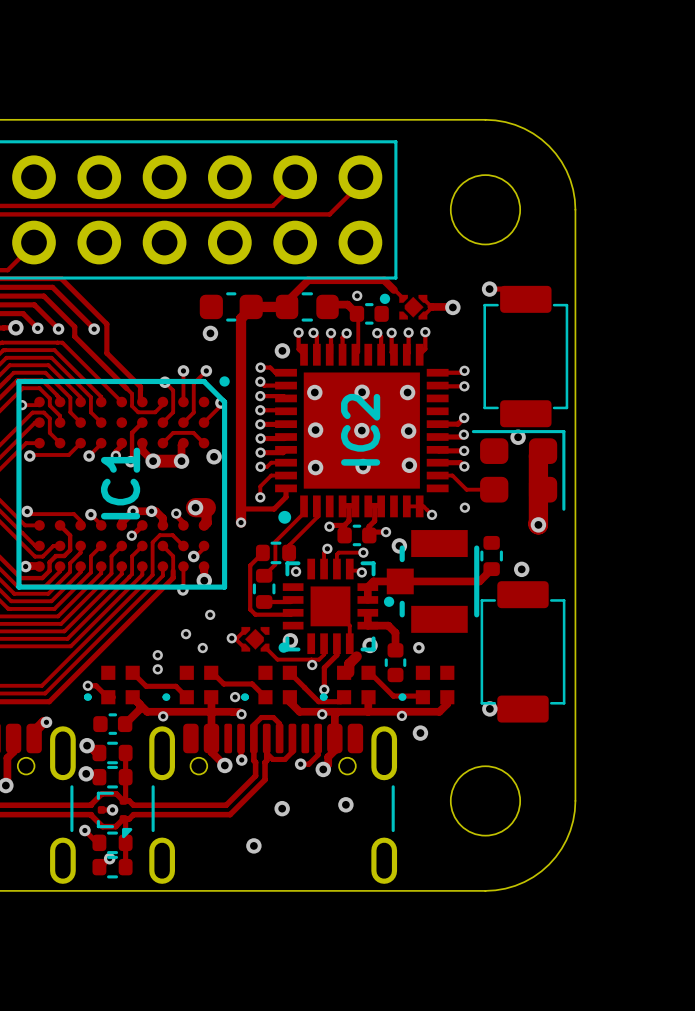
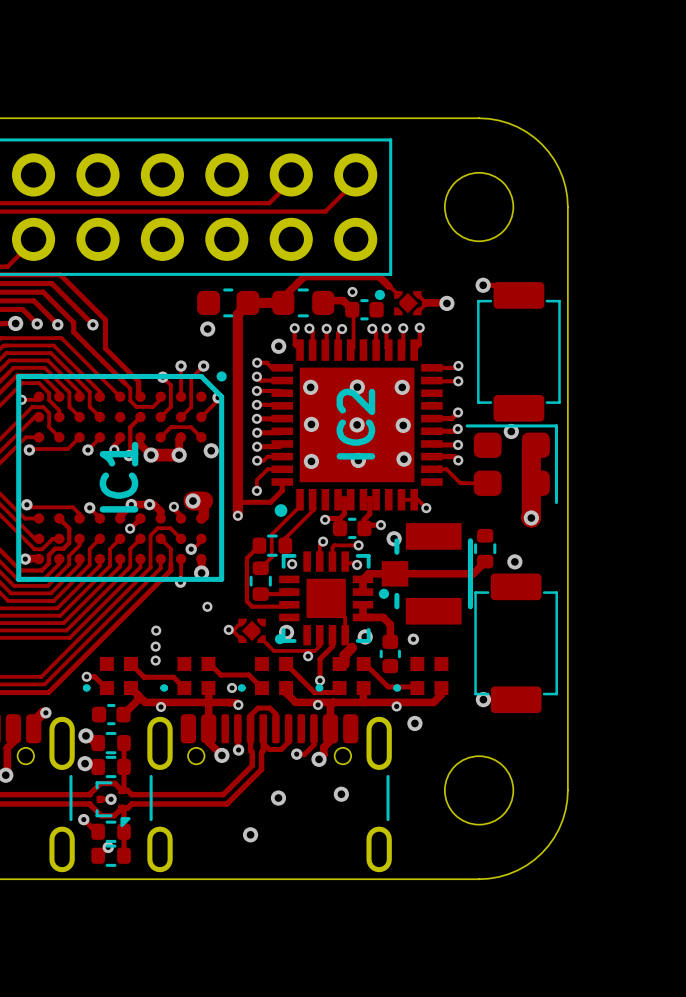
via: (464, 507) -> none
via: (186, 634) -> none
via: none -> (156, 630)
via: (202, 648) -> none

